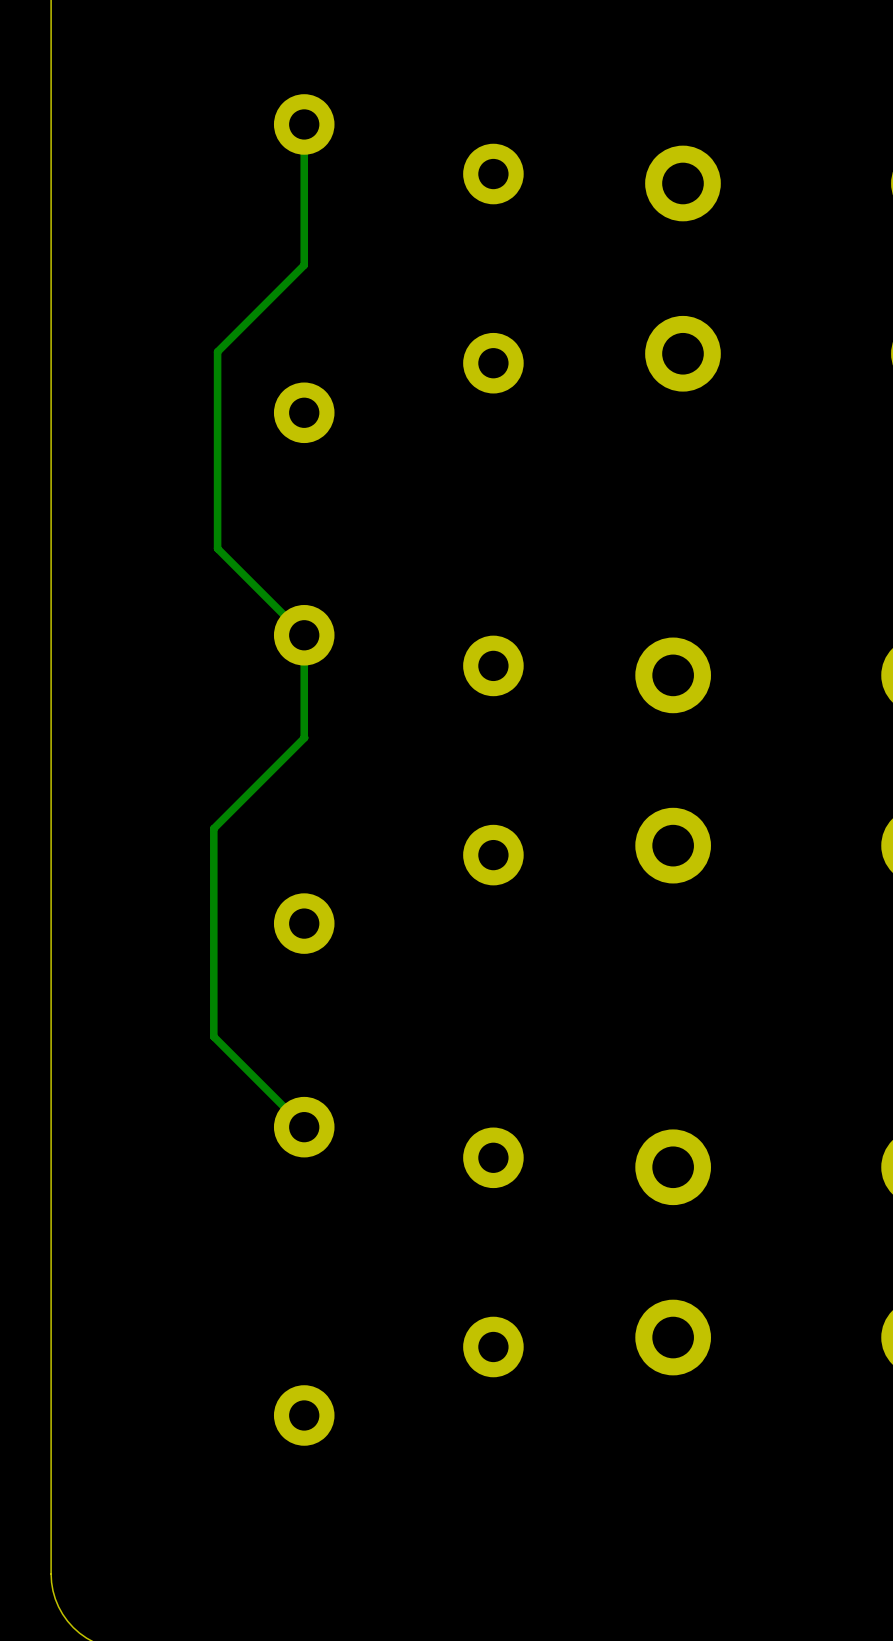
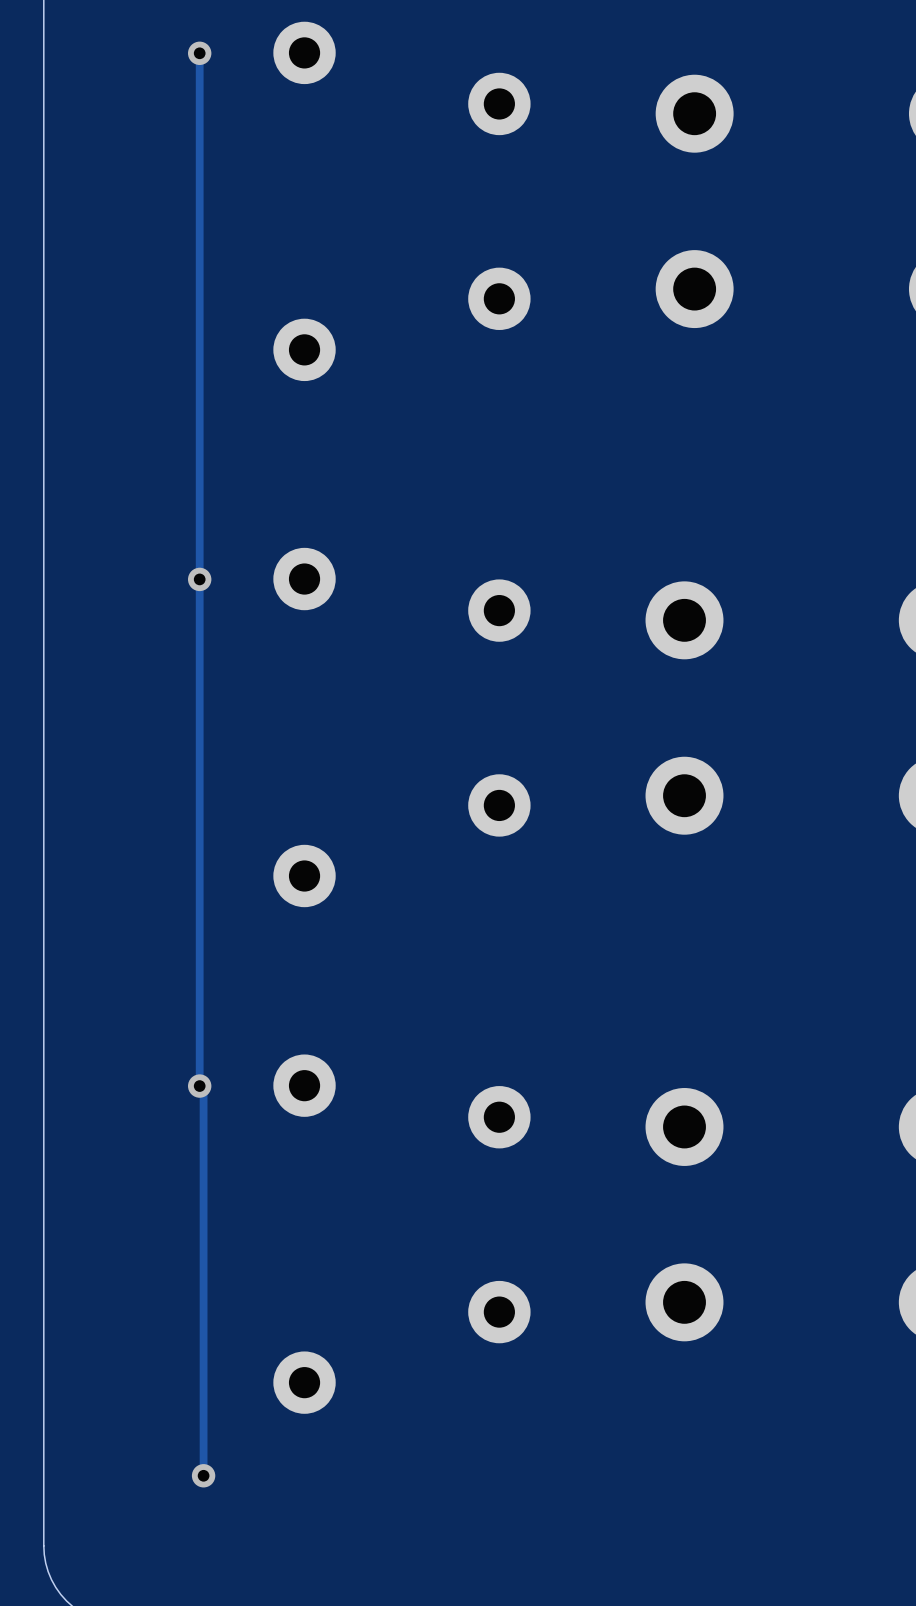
track: none -> (199, 53) (199, 1086) (203, 1089) (203, 1475)
via: none -> (199, 53)
track: (304, 124) (304, 265) (217, 351) (217, 548) (304, 635) (304, 737) -> none
via: none -> (199, 579)
track: (304, 737) (213, 828) (213, 1036) (304, 1127) -> none
via: none -> (199, 1086)
via: none -> (203, 1475)

